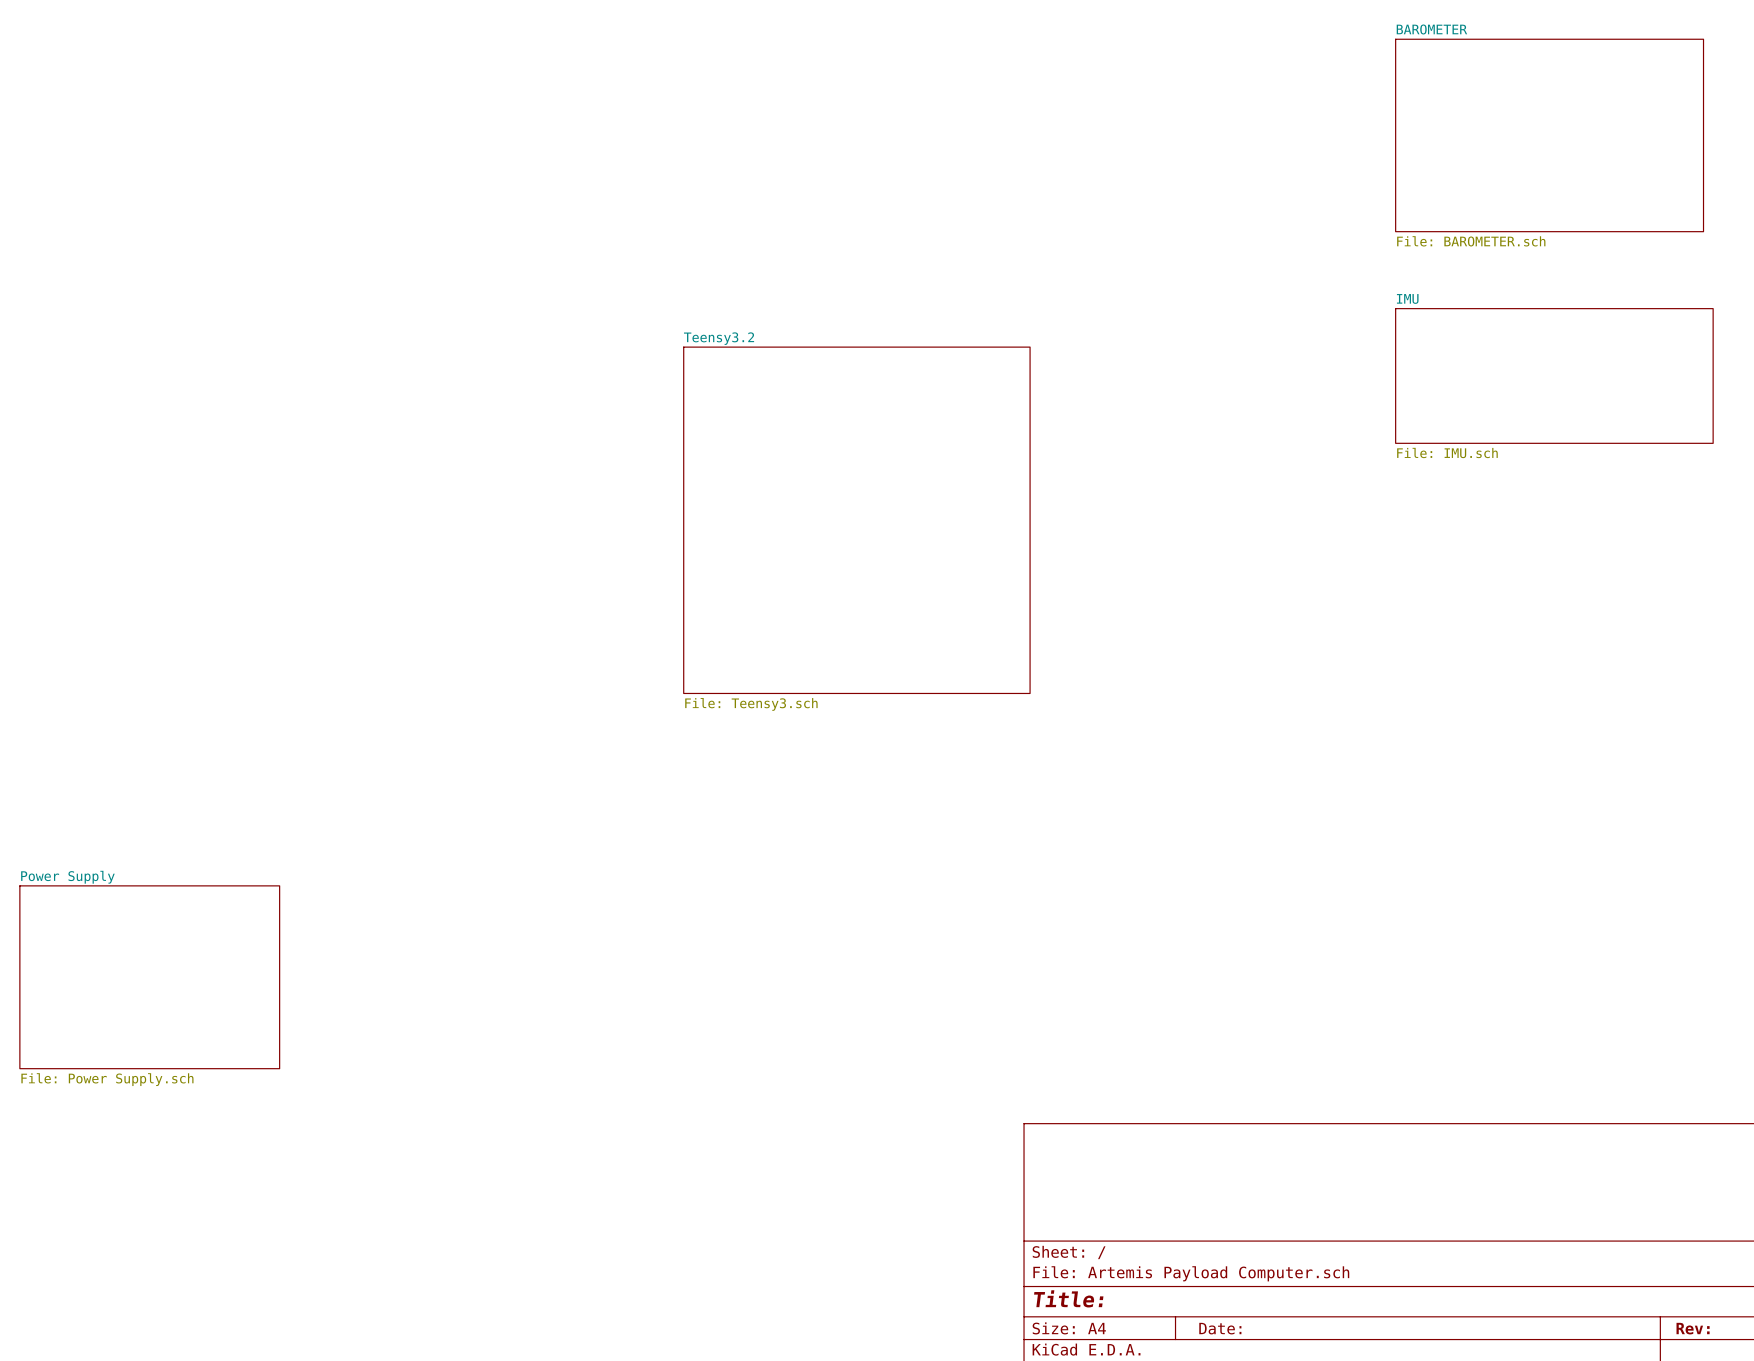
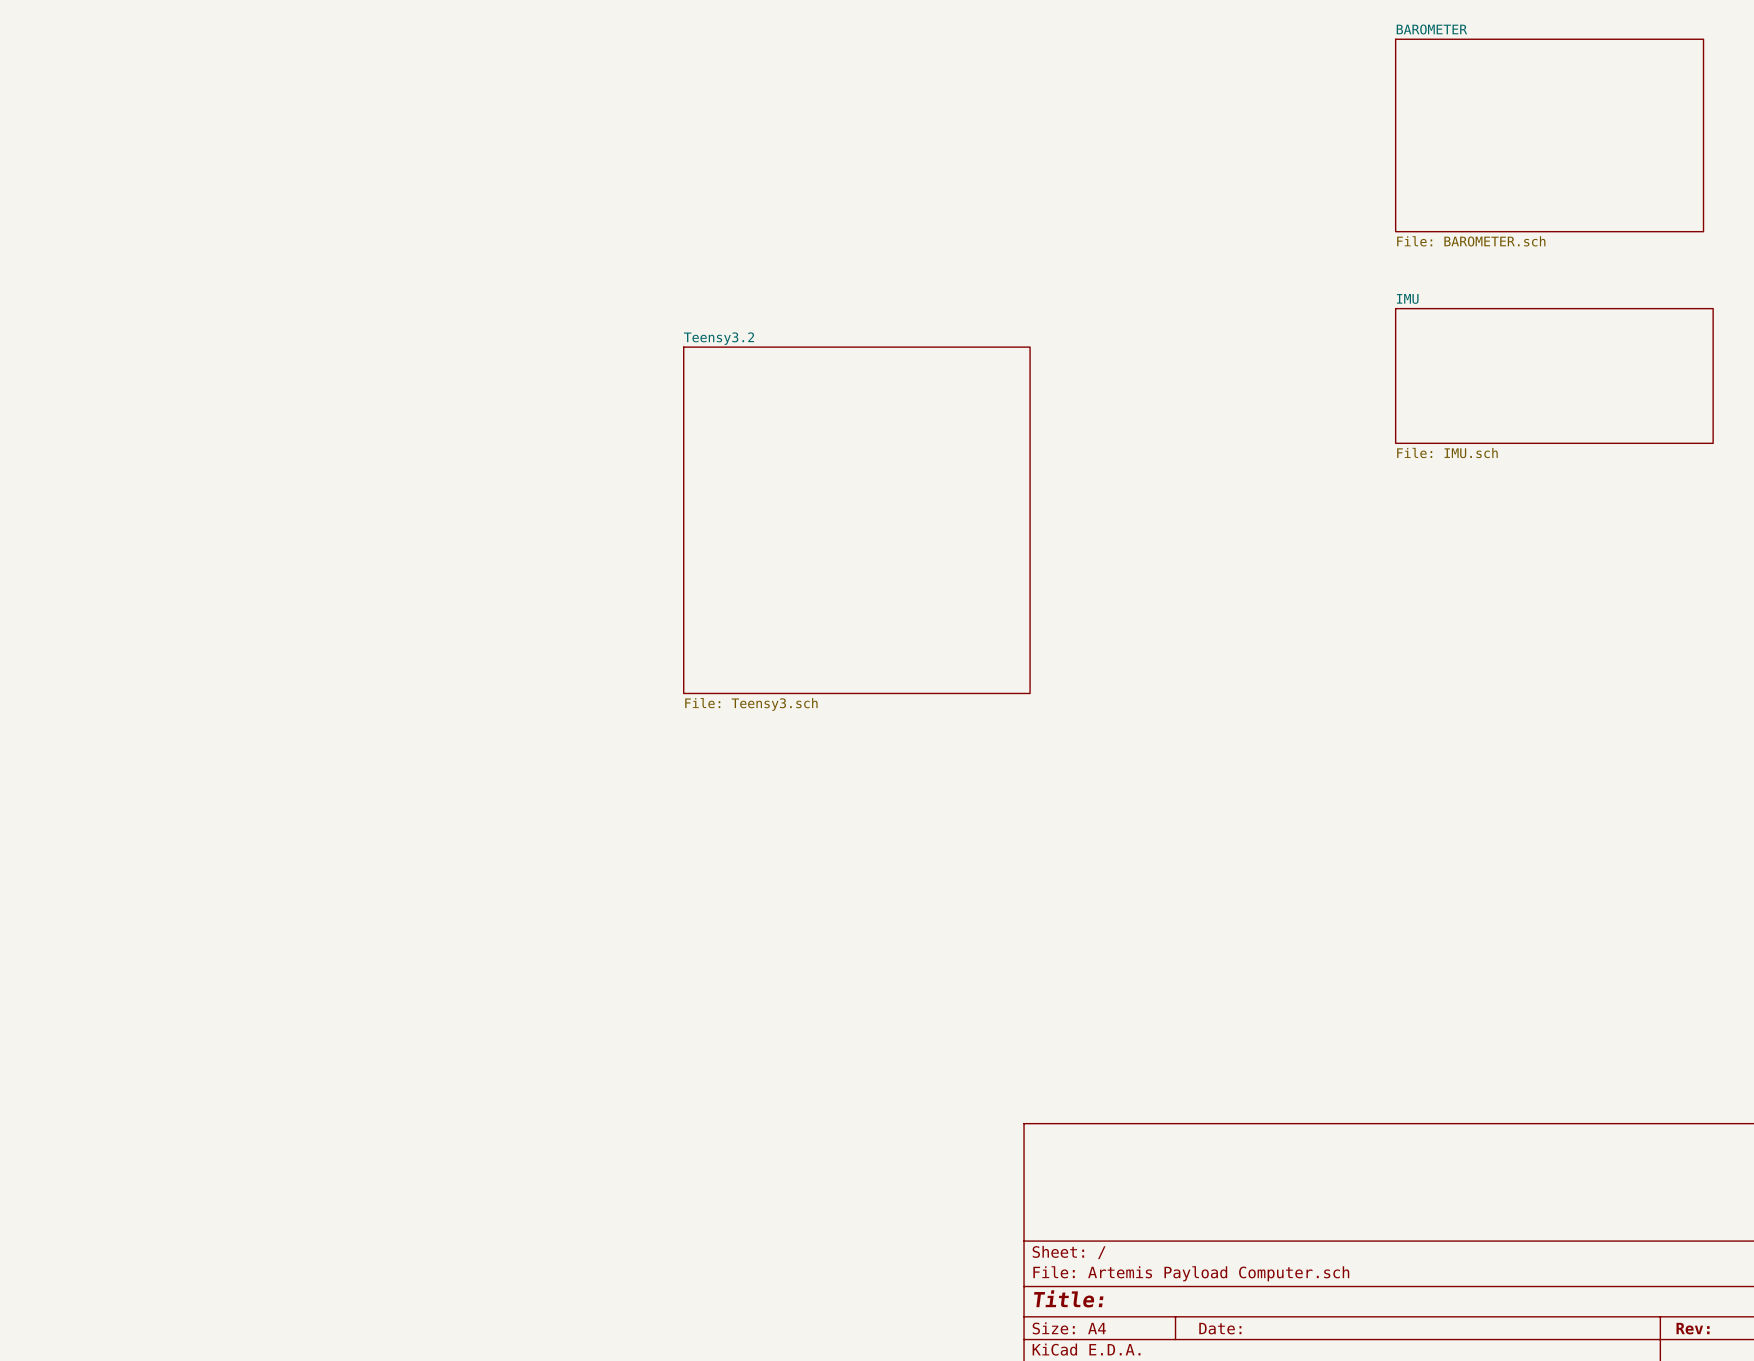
sheet Power Supply: File: Power Supply.sch (149, 977) -> none

